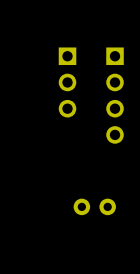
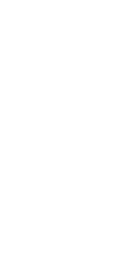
part: (67, 82) -> none
part: (115, 95) -> none
part: (94, 206) -> none

